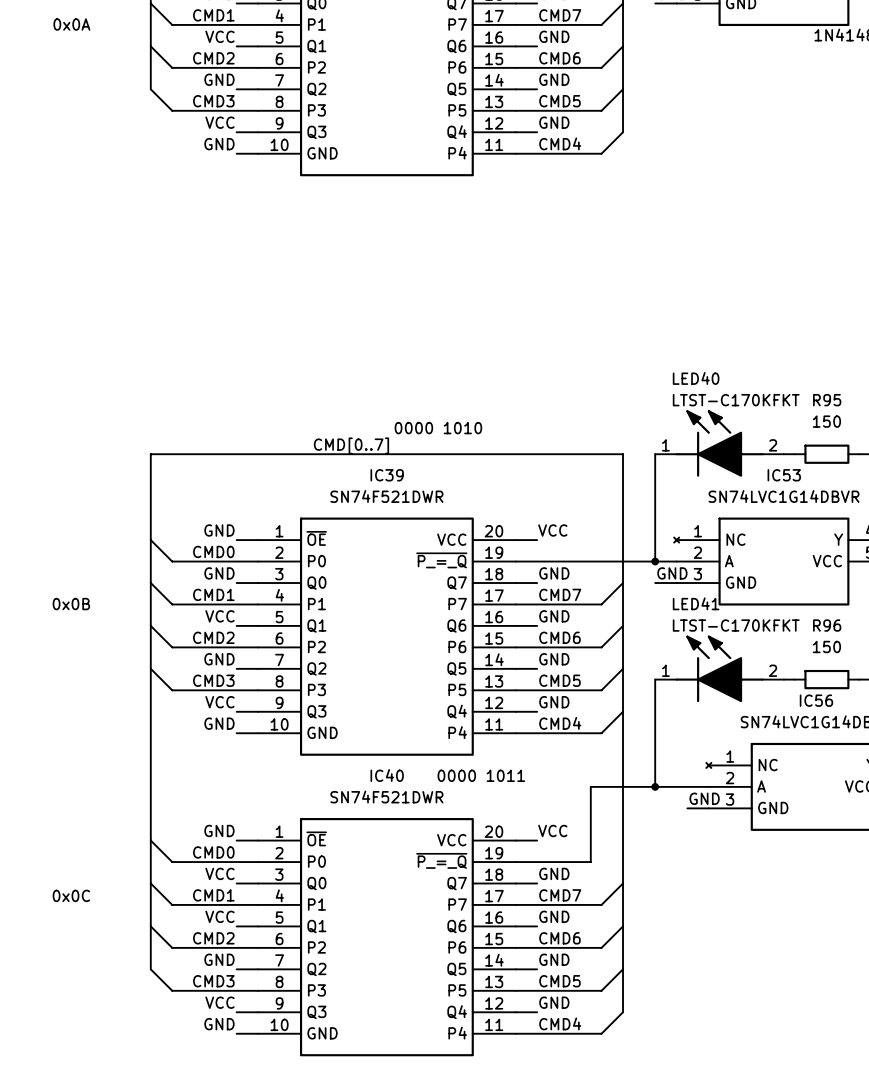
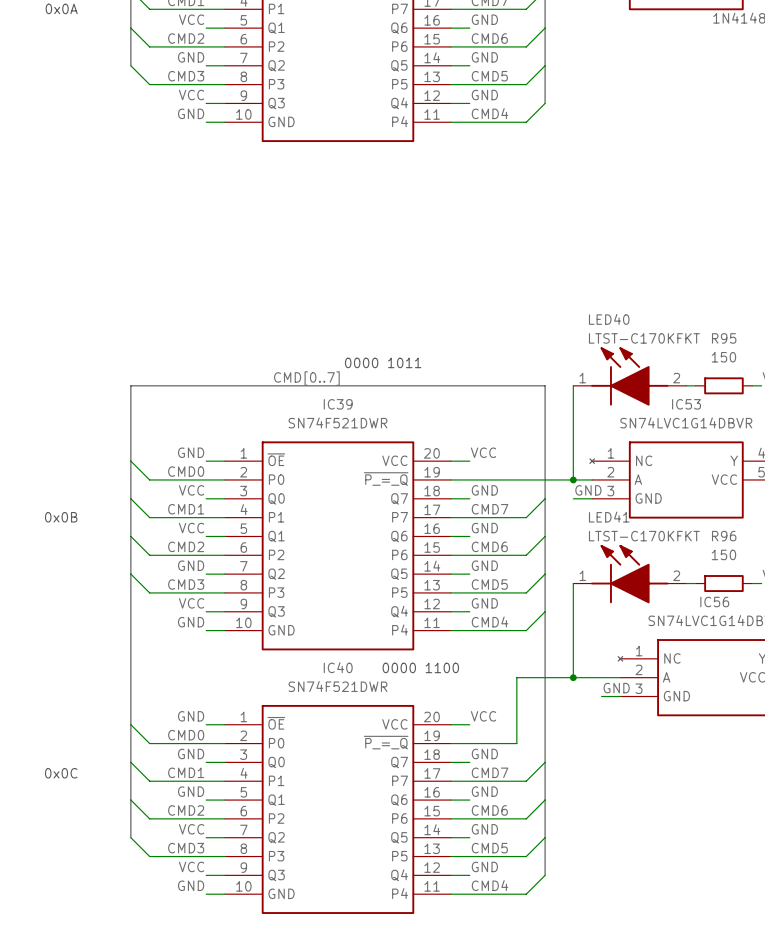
text: 0000 1010 (438, 428) -> 0000 1011 (383, 362)
label: GND (219, 573) -> VCC (191, 490)
text: 0000 1011 (481, 775) -> 0000 1100 (420, 667)
label: VCC (219, 873) -> GND (191, 753)
label: VCC (219, 916) -> GND (191, 791)
label: GND (219, 959) -> VCC (191, 829)

